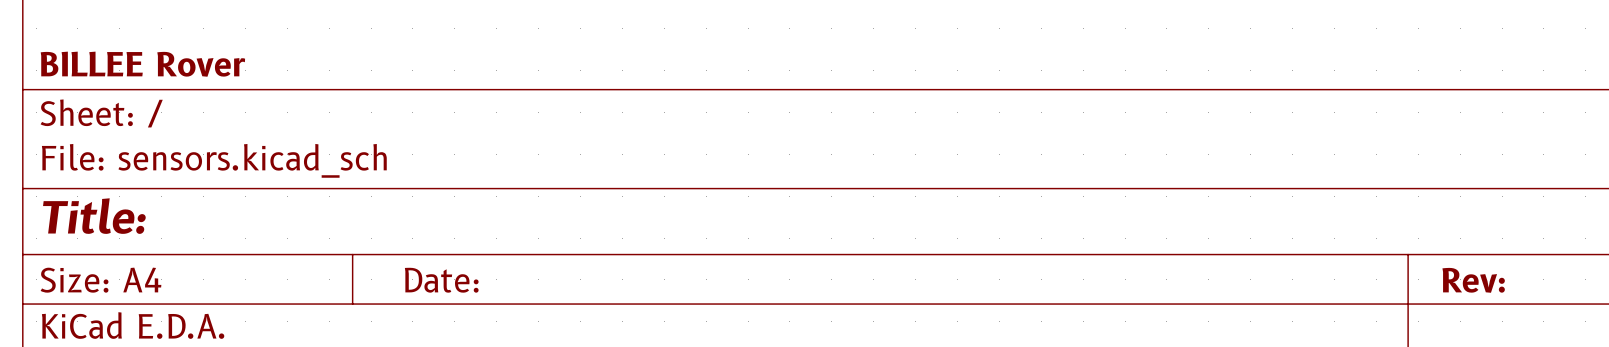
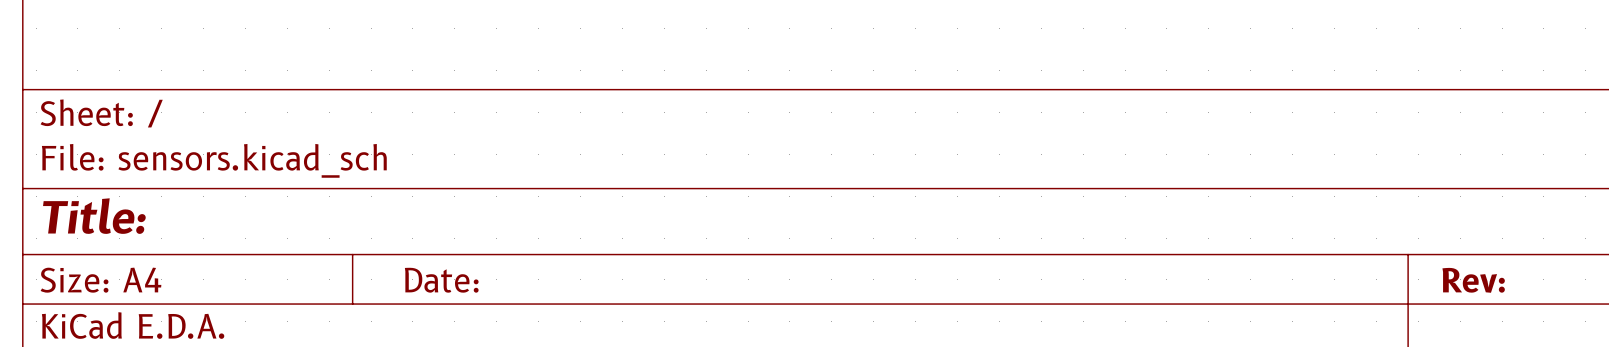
title block: BILLEE Rover (142, 64) -> none

